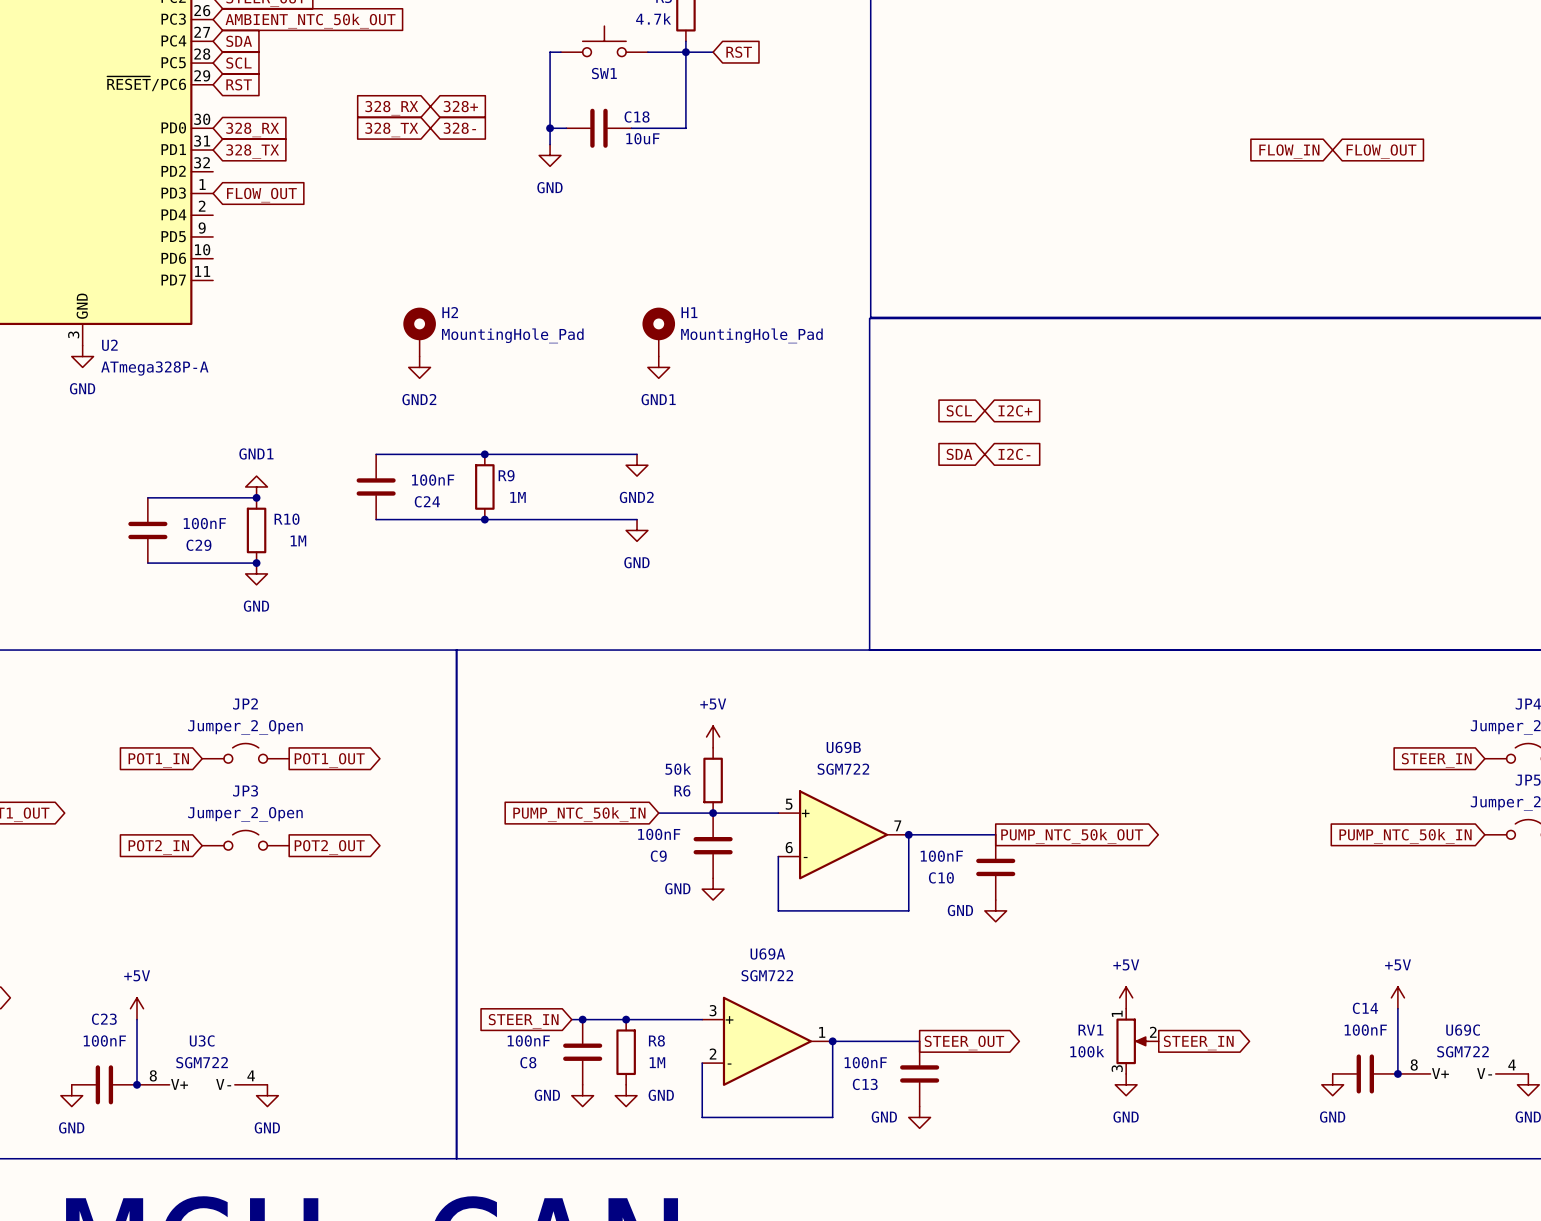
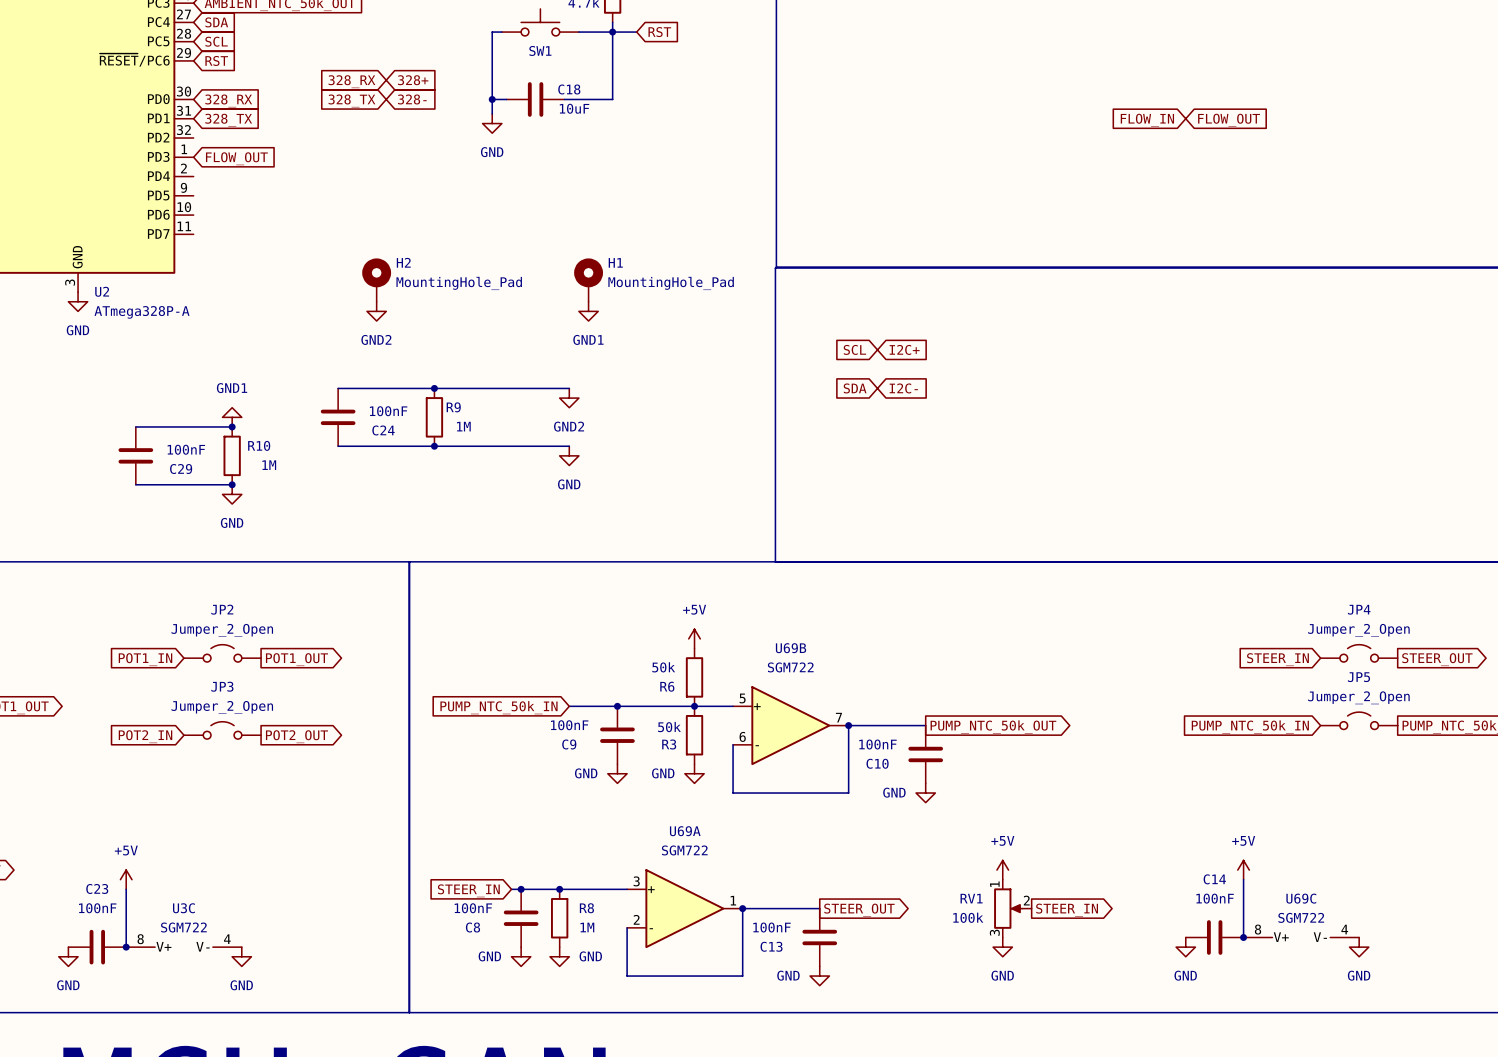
power symbol position: +5V (713, 736) -> +5V (694, 638)
R6 position: (713, 780) -> (694, 677)
wire: none -> (569, 706) (588, 706)
junction position: (713, 813) -> (617, 706)
junction: none -> (694, 706)
global label position: PUMP_NTC_50k_IN (579, 814) -> PUMP_NTC_50k_IN (498, 707)
U69B position: (843, 834) -> (790, 725)
junction position: (908, 834) -> (848, 725)
wire: (952, 834) (908, 834) (908, 910) -> (848, 725) (848, 793) (810, 793)
wire: none -> (887, 725) (925, 725)
global label position: PUMP_NTC_50k_OUT (1072, 836) -> PUMP_NTC_50k_OUT (993, 726)
C9 position: (713, 845) -> (617, 735)
R3: none -> 50k (694, 735)
wire: (778, 856) (778, 910) (821, 910) -> (733, 744) (733, 793)
C10 position: (995, 867) -> (925, 754)
power symbol position: GND (713, 889) -> GND (617, 773)
power symbol: none -> GND (694, 773)
power symbol position: GND (995, 910) -> GND (925, 793)

